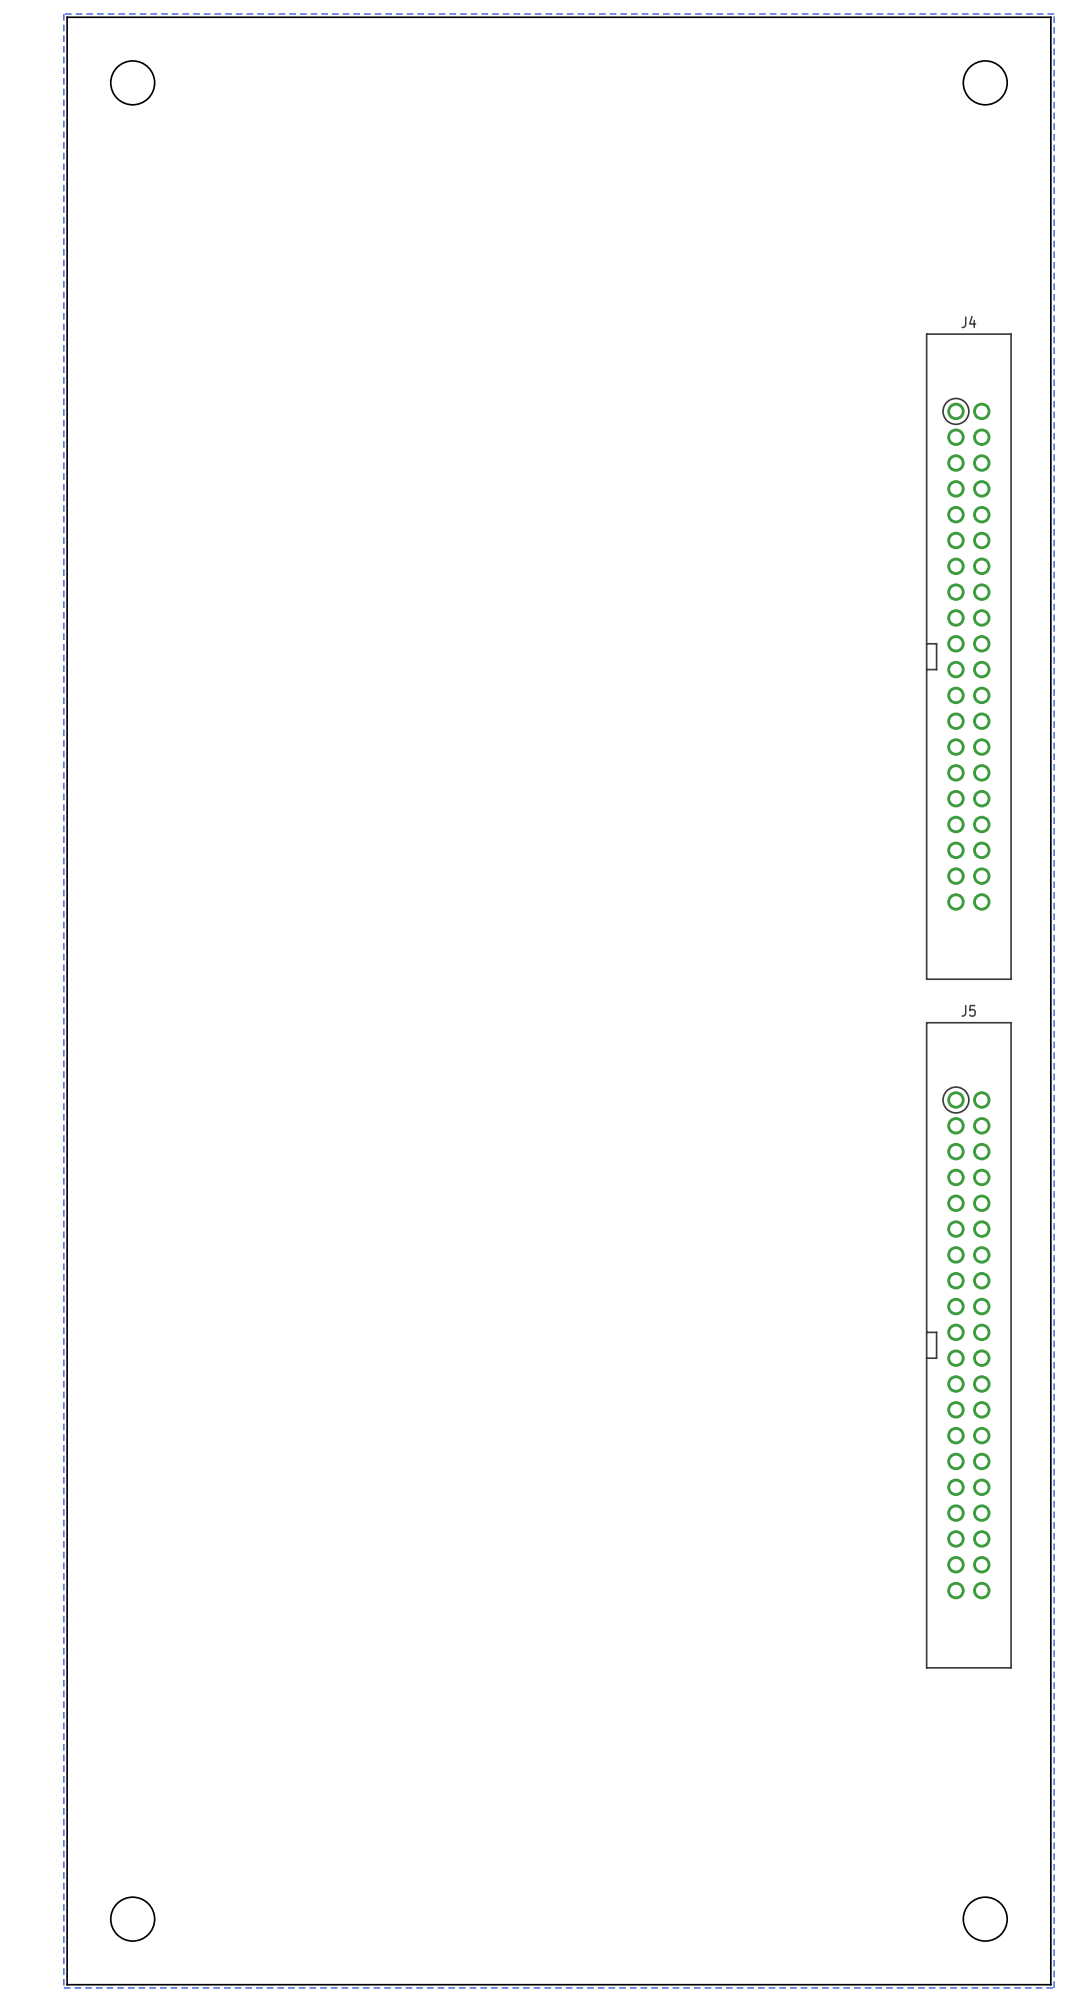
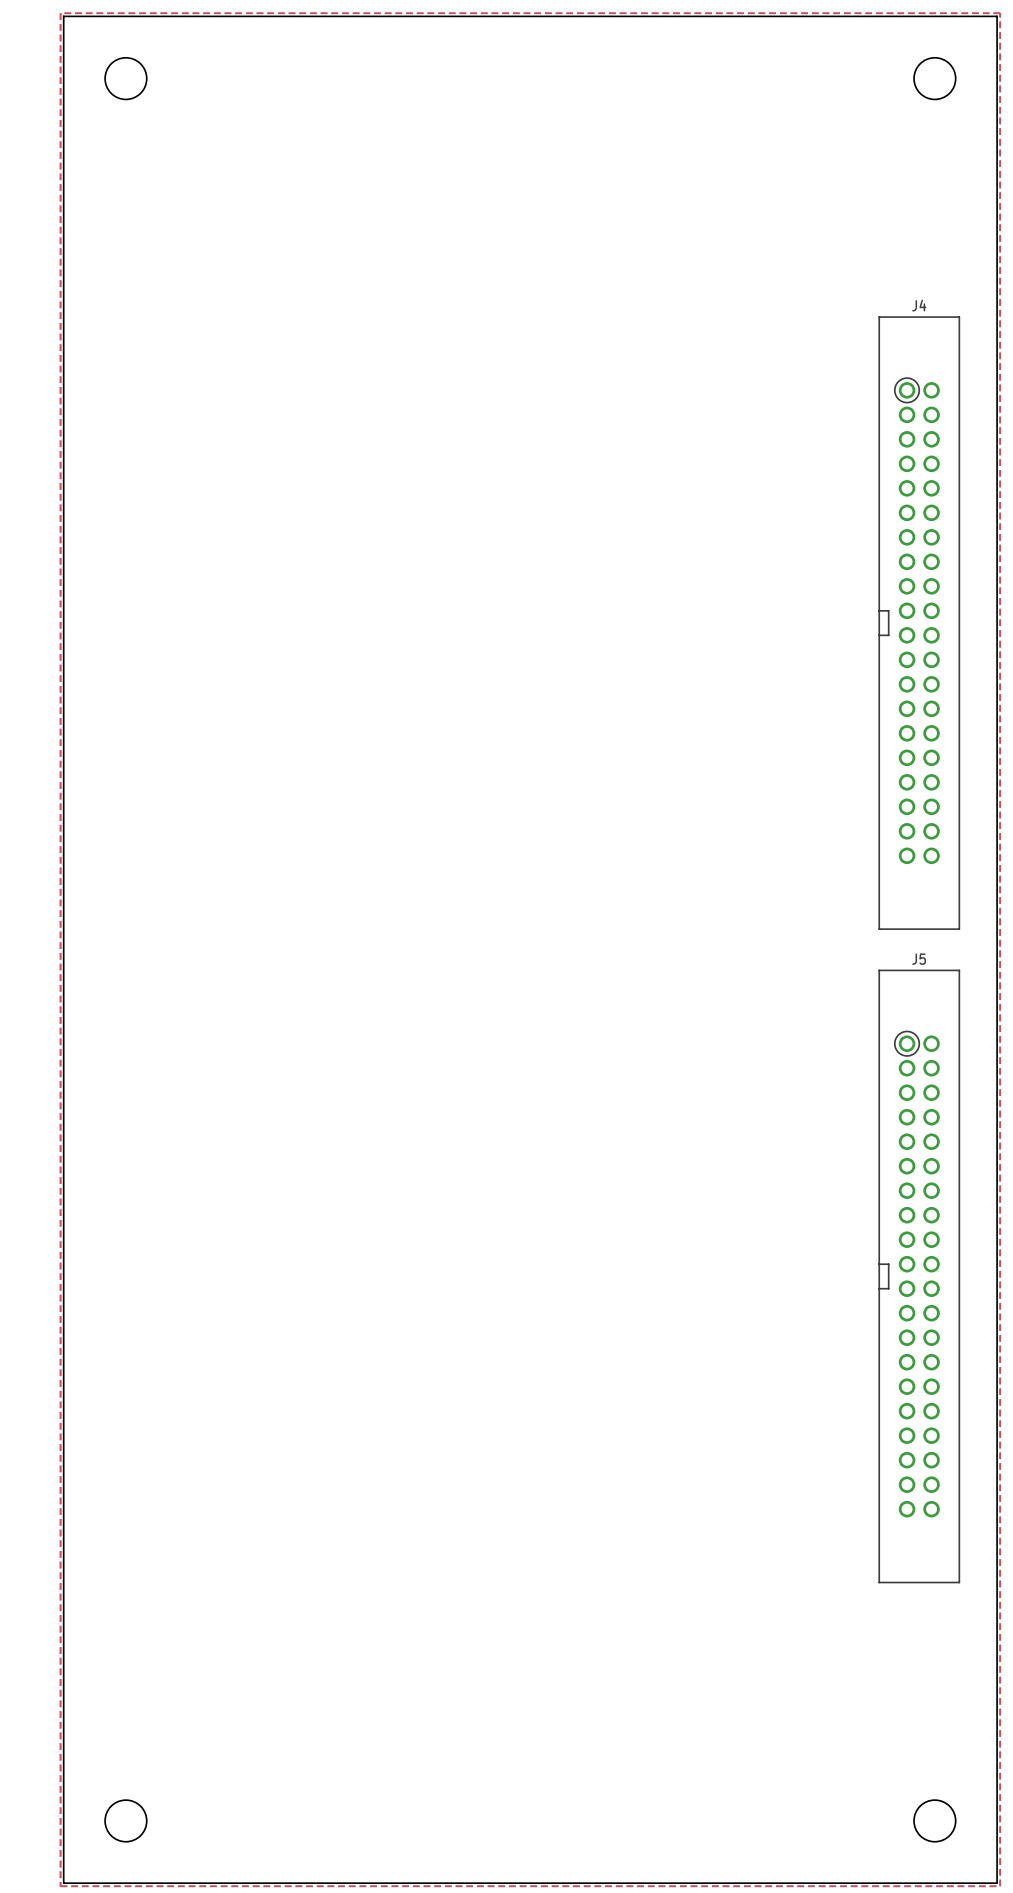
top zone outline: none -> (60, 13) (60, 1886) (1000, 1886) (1000, 13) (60, 13)

